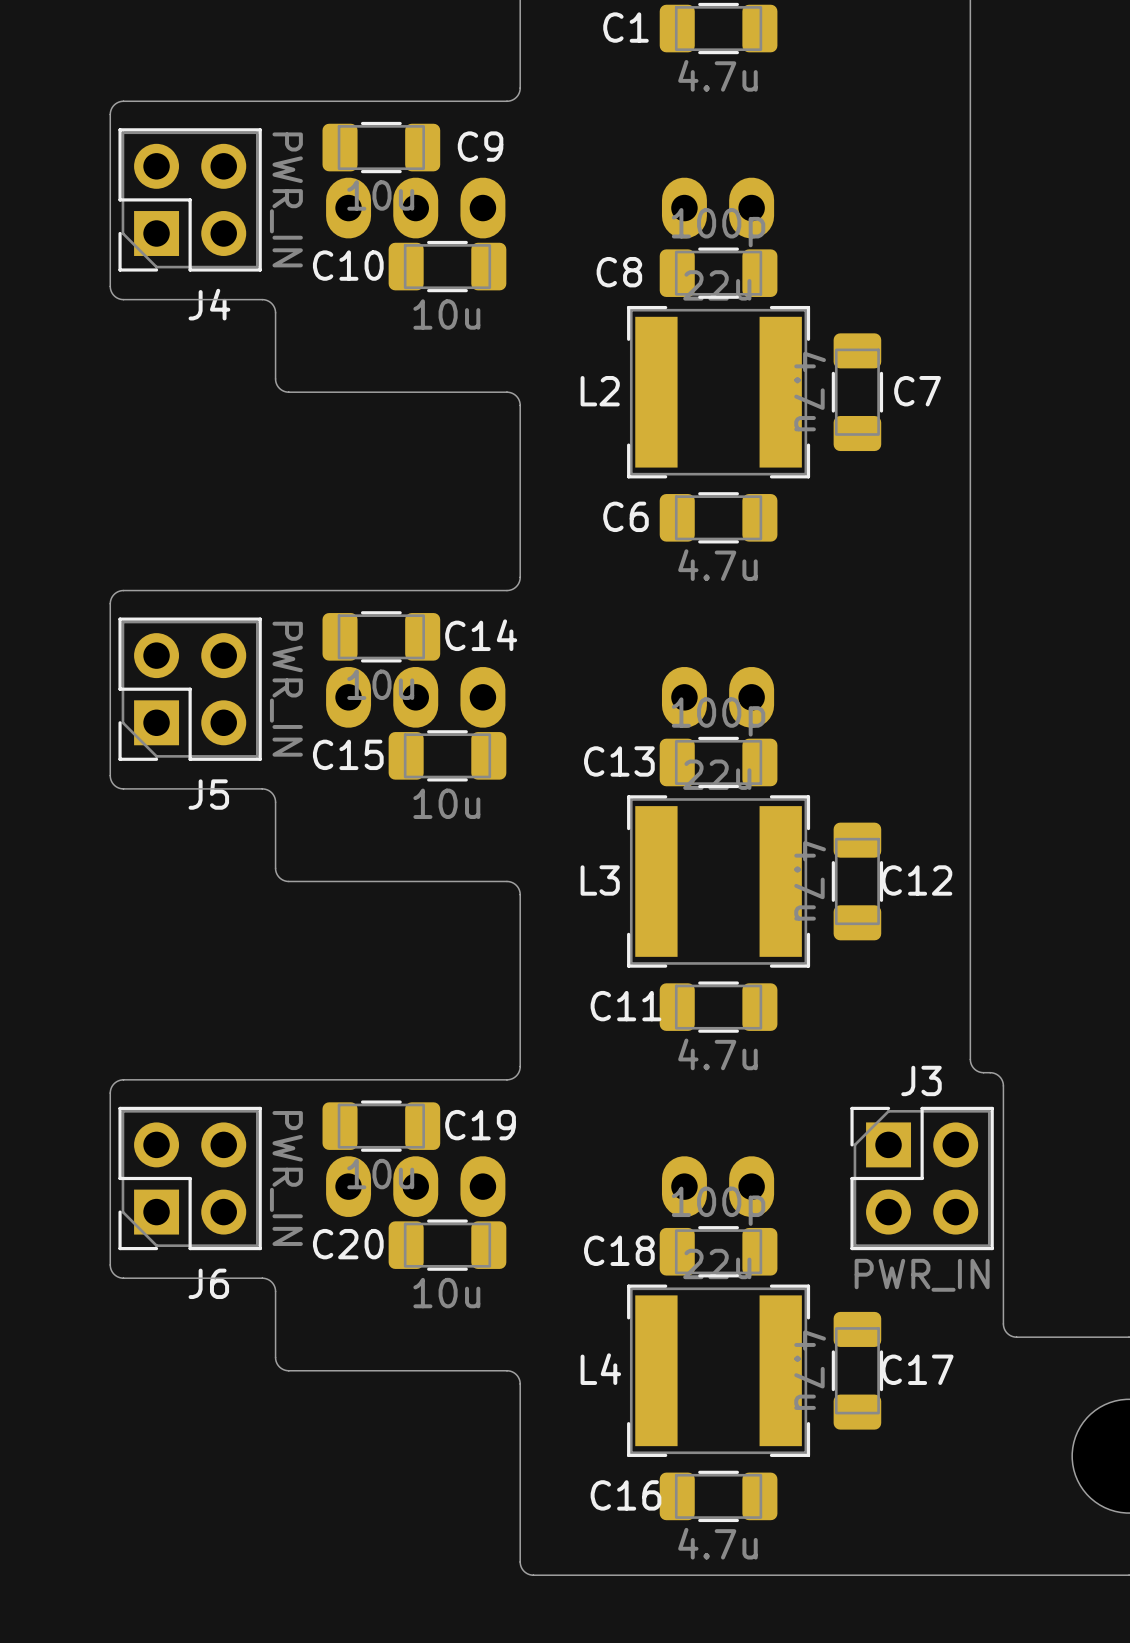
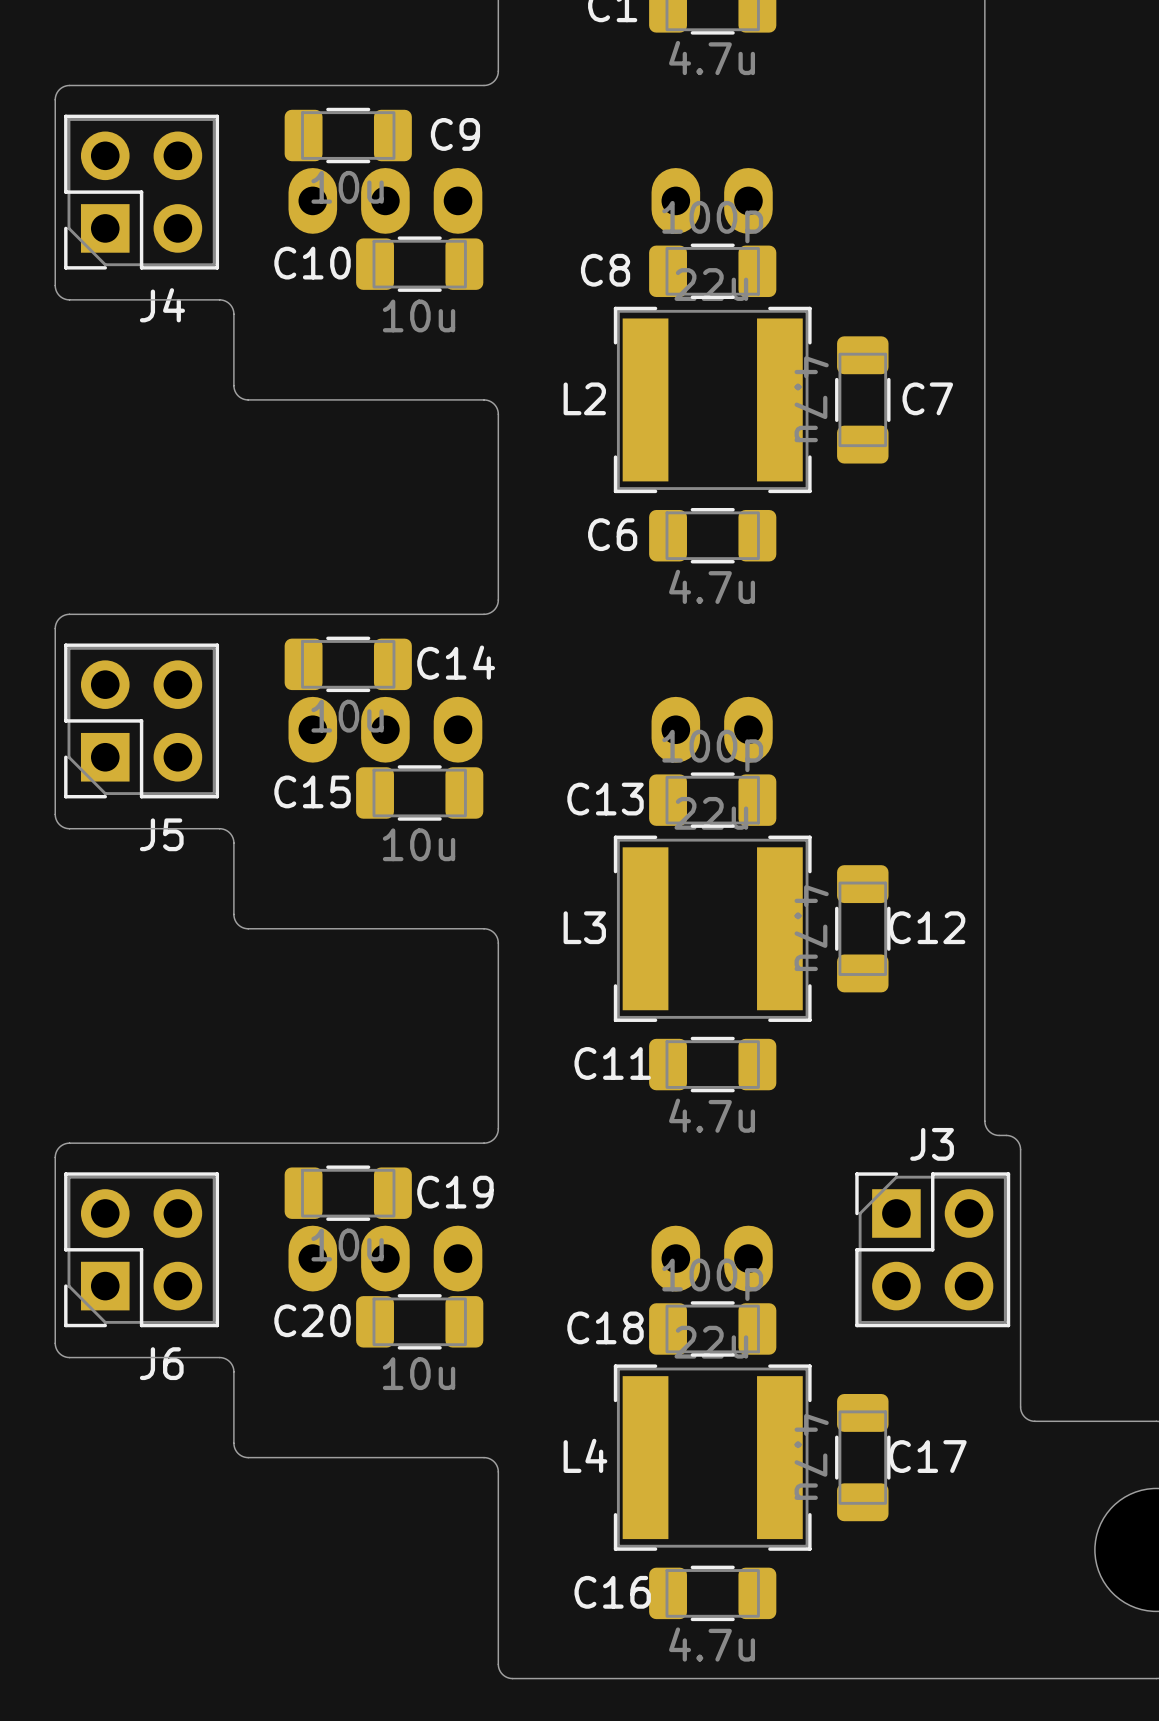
J4 value: PWR_IN (286, 199) -> none
J5 value: PWR_IN (286, 689) -> none
J6 value: PWR_IN (286, 1178) -> none
J3 value: PWR_IN (922, 1275) -> none

